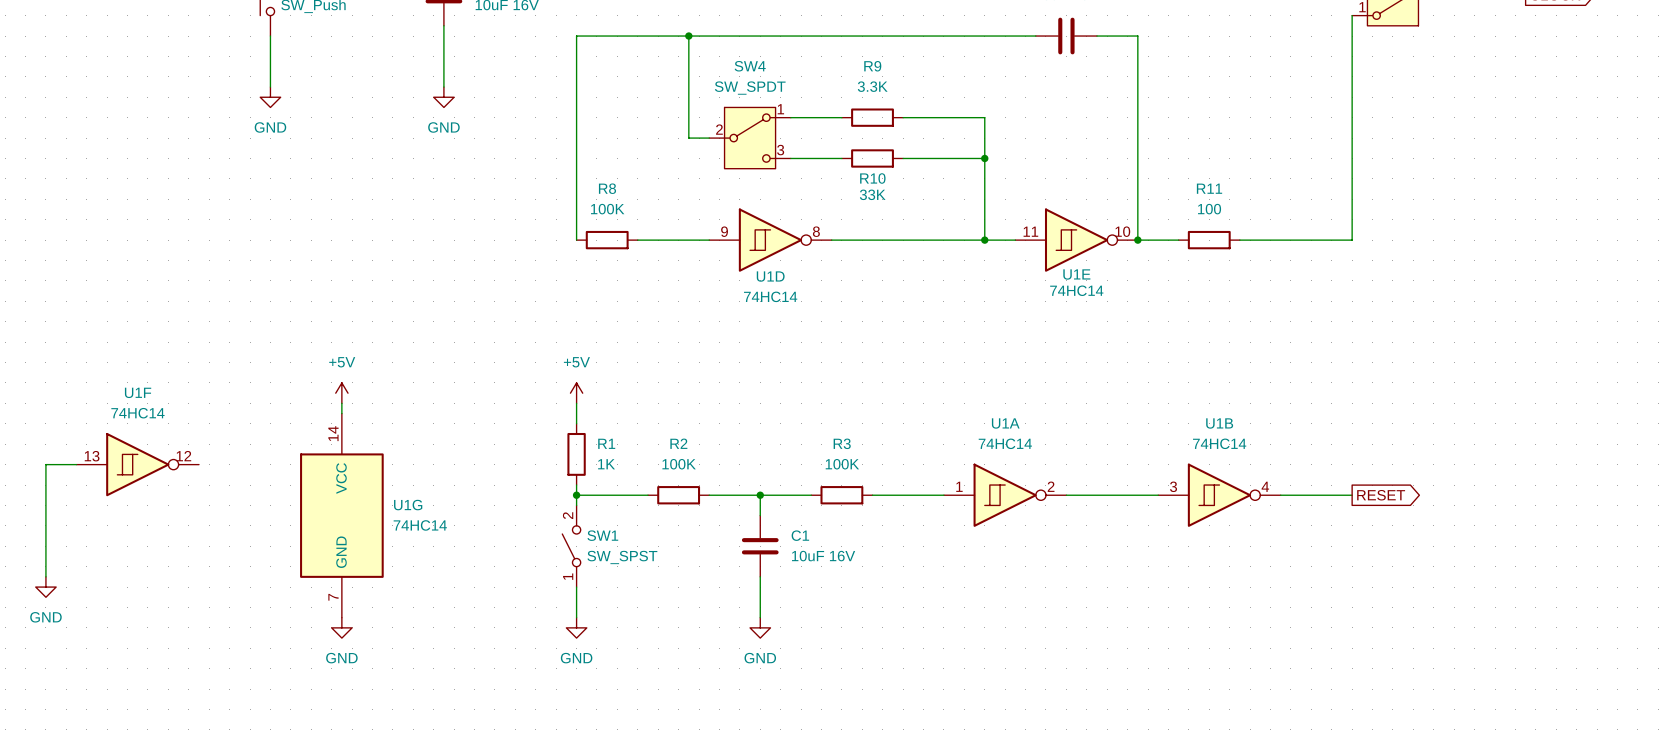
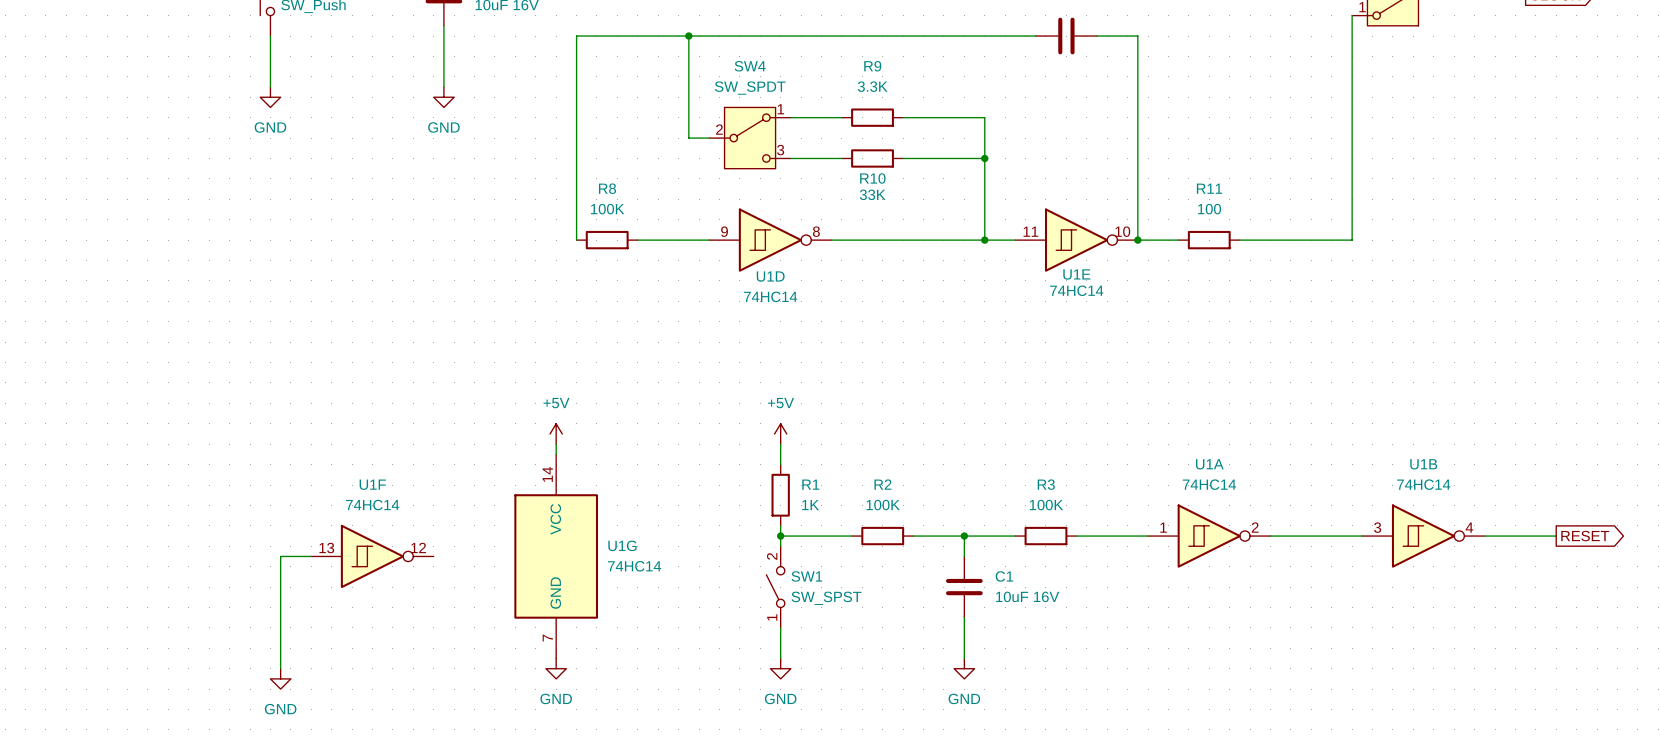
power symbol: +5V (341, 393) -> none
power symbol position: +5V (576, 393) -> +5V (556, 434)
wire: (341, 403) (341, 413) -> none
wire: (576, 403) (576, 423) -> none
power symbol: none -> +5V (780, 434)
wire: none -> (556, 444) (556, 454)
wire: none -> (780, 444) (780, 464)
R1 position: (576, 454) -> (780, 495)
wire: (76, 464) (45, 464) (45, 576) -> none
U1F position: (137, 464) -> (372, 556)
wire: (576, 495) (648, 495) -> none
junction: (576, 495) -> none
R2 position: (678, 495) -> (882, 536)
wire: (709, 495) (811, 495) -> none
wire: (760, 495) (760, 515) -> (780, 525) (780, 546)
junction position: (760, 495) -> (780, 536)
R3 position: (841, 495) -> (1045, 536)
wire: (872, 495) (943, 495) -> (780, 536) (852, 536)
U1A position: (1005, 495) -> (1209, 536)
wire: (1066, 495) (1158, 495) -> none
U1B position: (1219, 495) -> (1423, 536)
wire: (1280, 495) (1352, 495) -> none
global label: RESET (1381, 495) -> none
U1G position: (341, 515) -> (556, 556)
wire: none -> (913, 536) (1015, 536)
wire: none -> (964, 536) (964, 556)
junction: none -> (964, 536)
wire: none -> (1076, 536) (1148, 536)
wire: none -> (1270, 536) (1362, 536)
wire: none -> (1484, 536) (1556, 536)
global label: none -> RESET (1585, 536)
SW1 position: (571, 546) -> (775, 587)
C1 position: (760, 546) -> (964, 587)
wire: none -> (311, 556) (280, 556) (280, 668)
wire: (760, 576) (760, 617) -> none
power symbol: GND (45, 587) -> none
wire: none -> (964, 617) (964, 658)
power symbol position: GND (341, 627) -> GND (280, 678)
power symbol position: GND (576, 627) -> GND (556, 668)
power symbol position: GND (760, 627) -> GND (780, 668)
wire: none -> (780, 627) (780, 658)
power symbol: none -> GND (964, 668)

